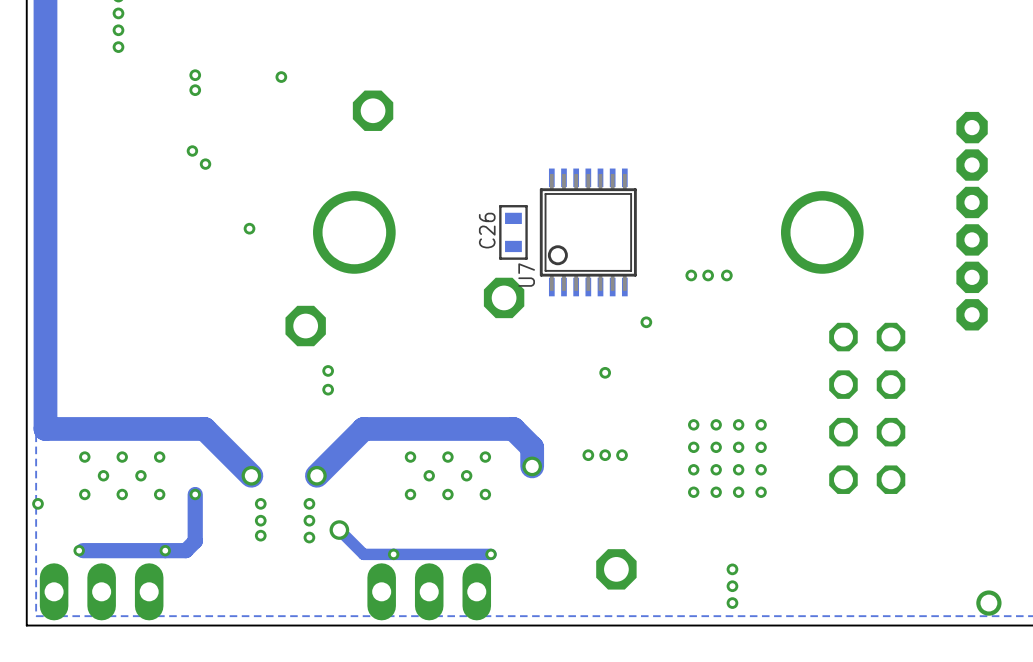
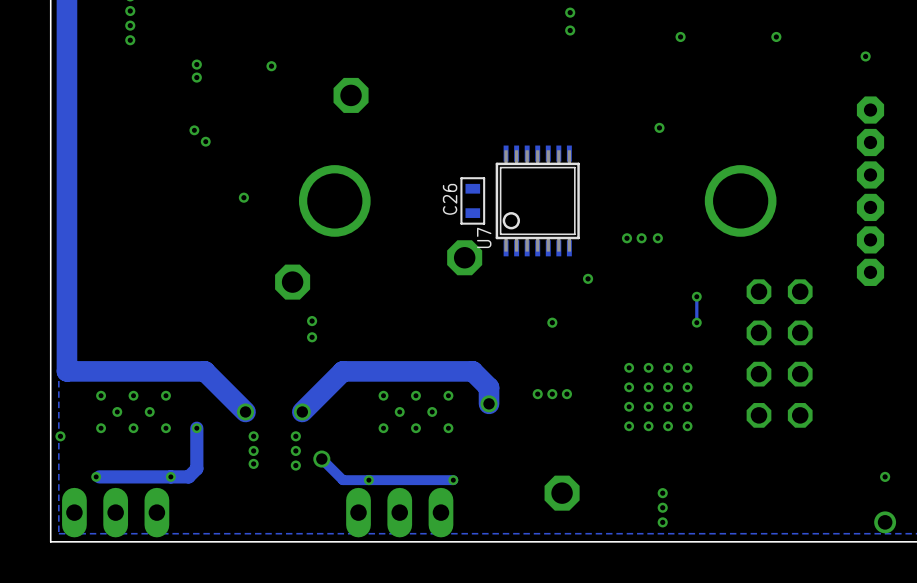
via: none -> (570, 12)
via: none -> (570, 30)
via: none -> (680, 36)
via: none -> (776, 36)
via: none -> (865, 56)
via: none -> (659, 127)
track: none -> (696, 296) (696, 322)
via: none -> (696, 296)
via: none -> (696, 322)
via: none -> (885, 476)

